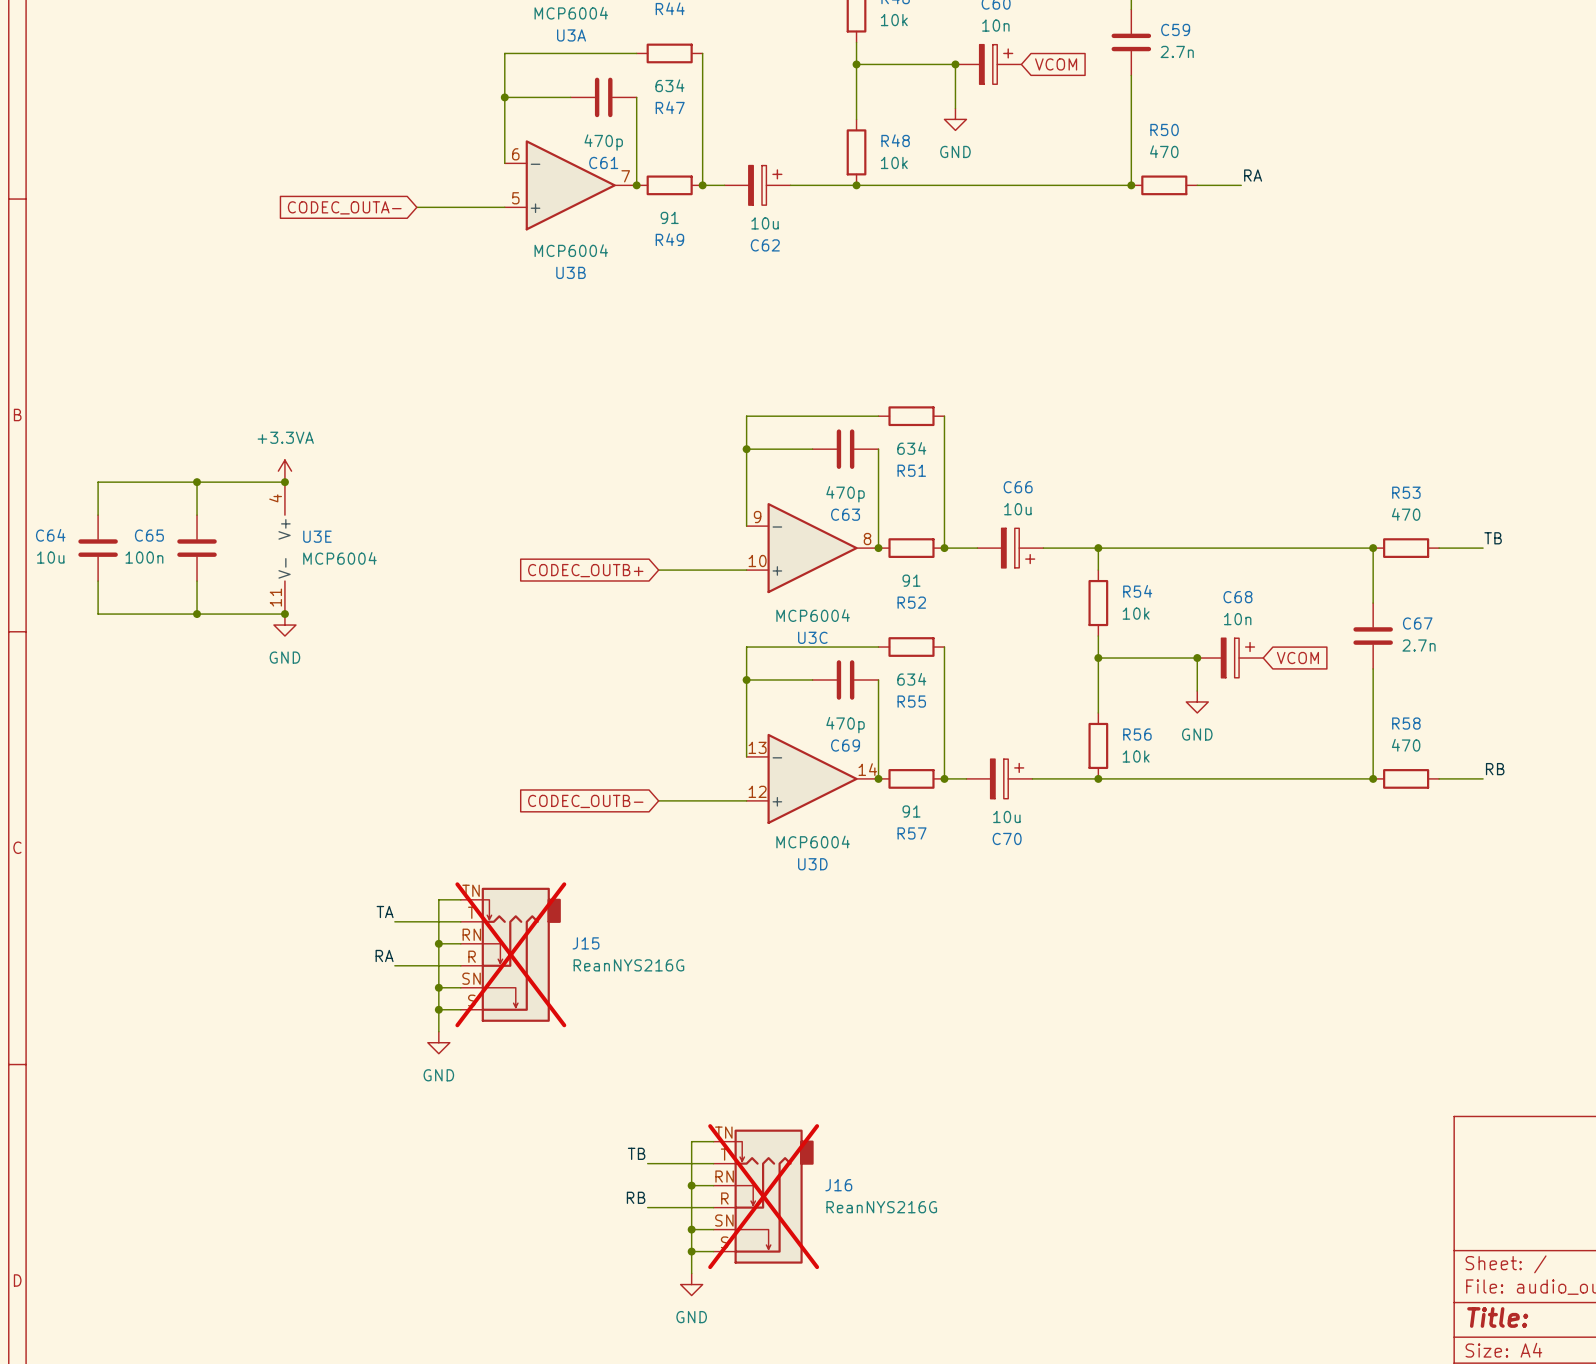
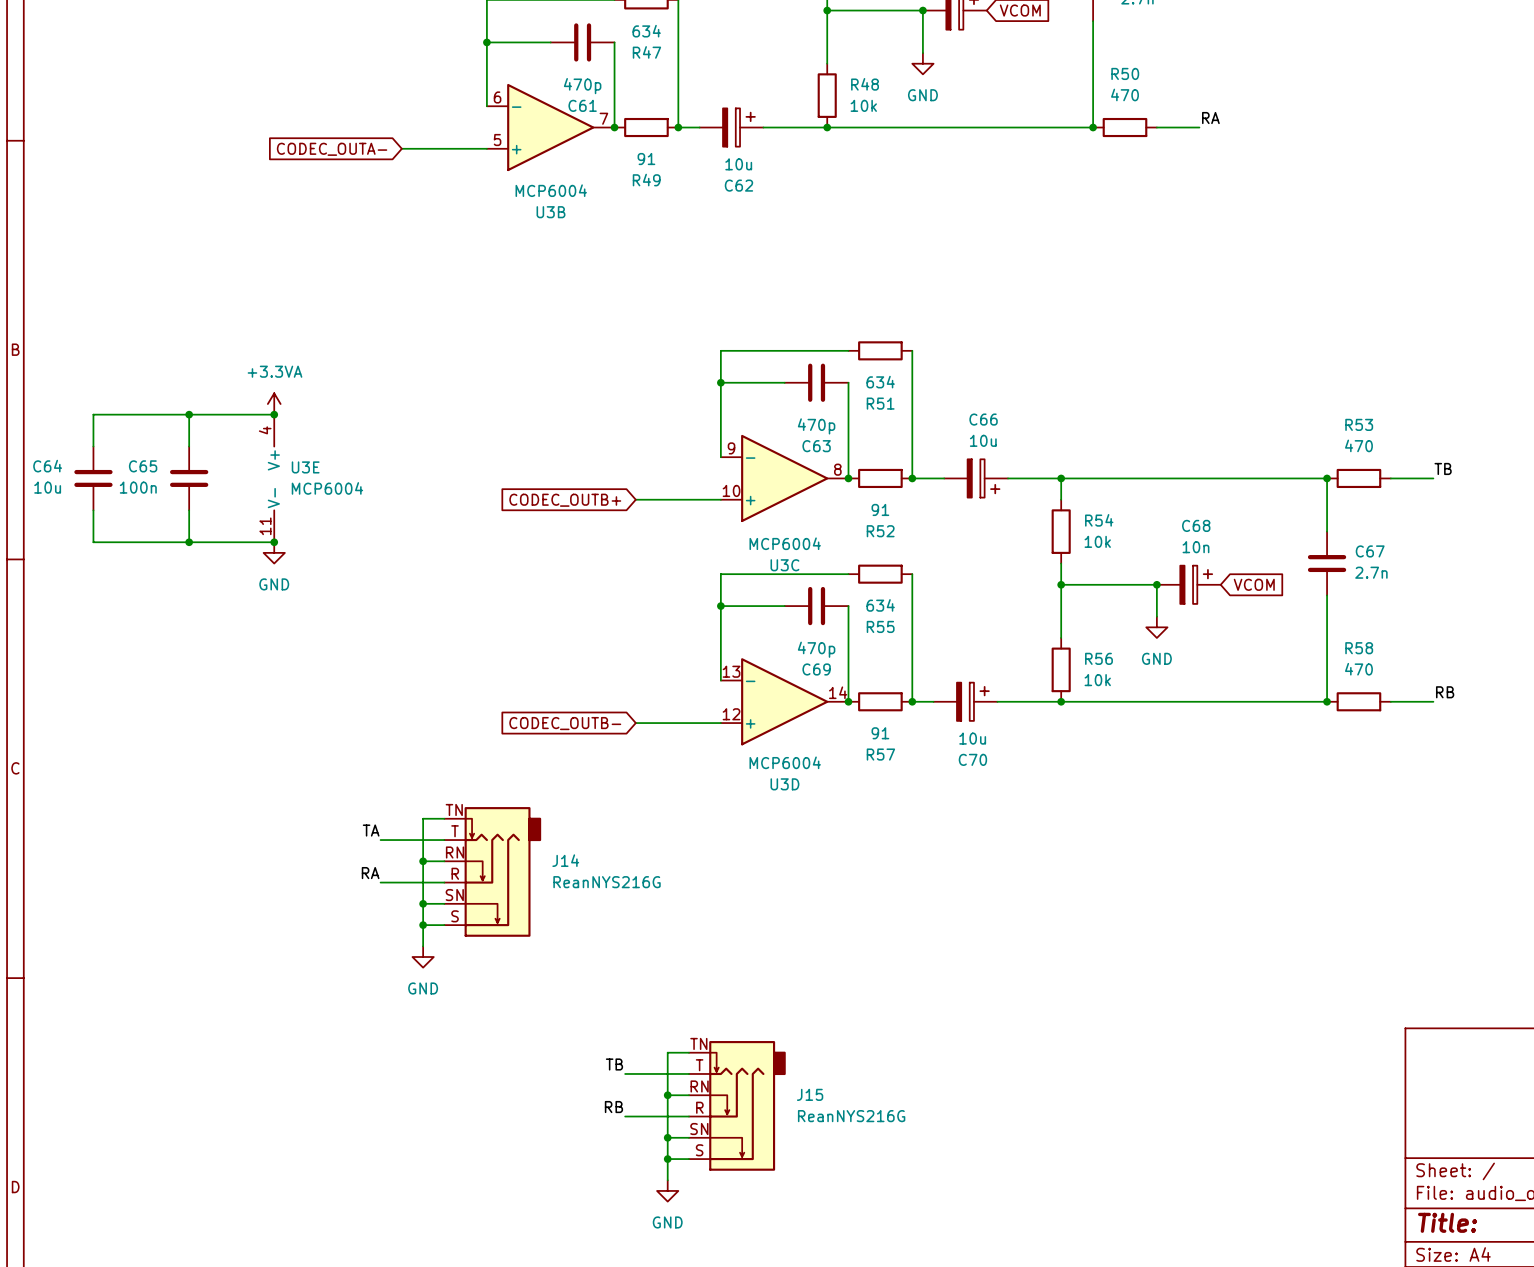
J15 name: J15 (586, 943) -> J14 (565, 860)
J15 do-not-place cross: (510, 954) -> none
J16 name: J16 (838, 1185) -> J15 (810, 1094)
J16 do-not-place cross: (763, 1196) -> none

